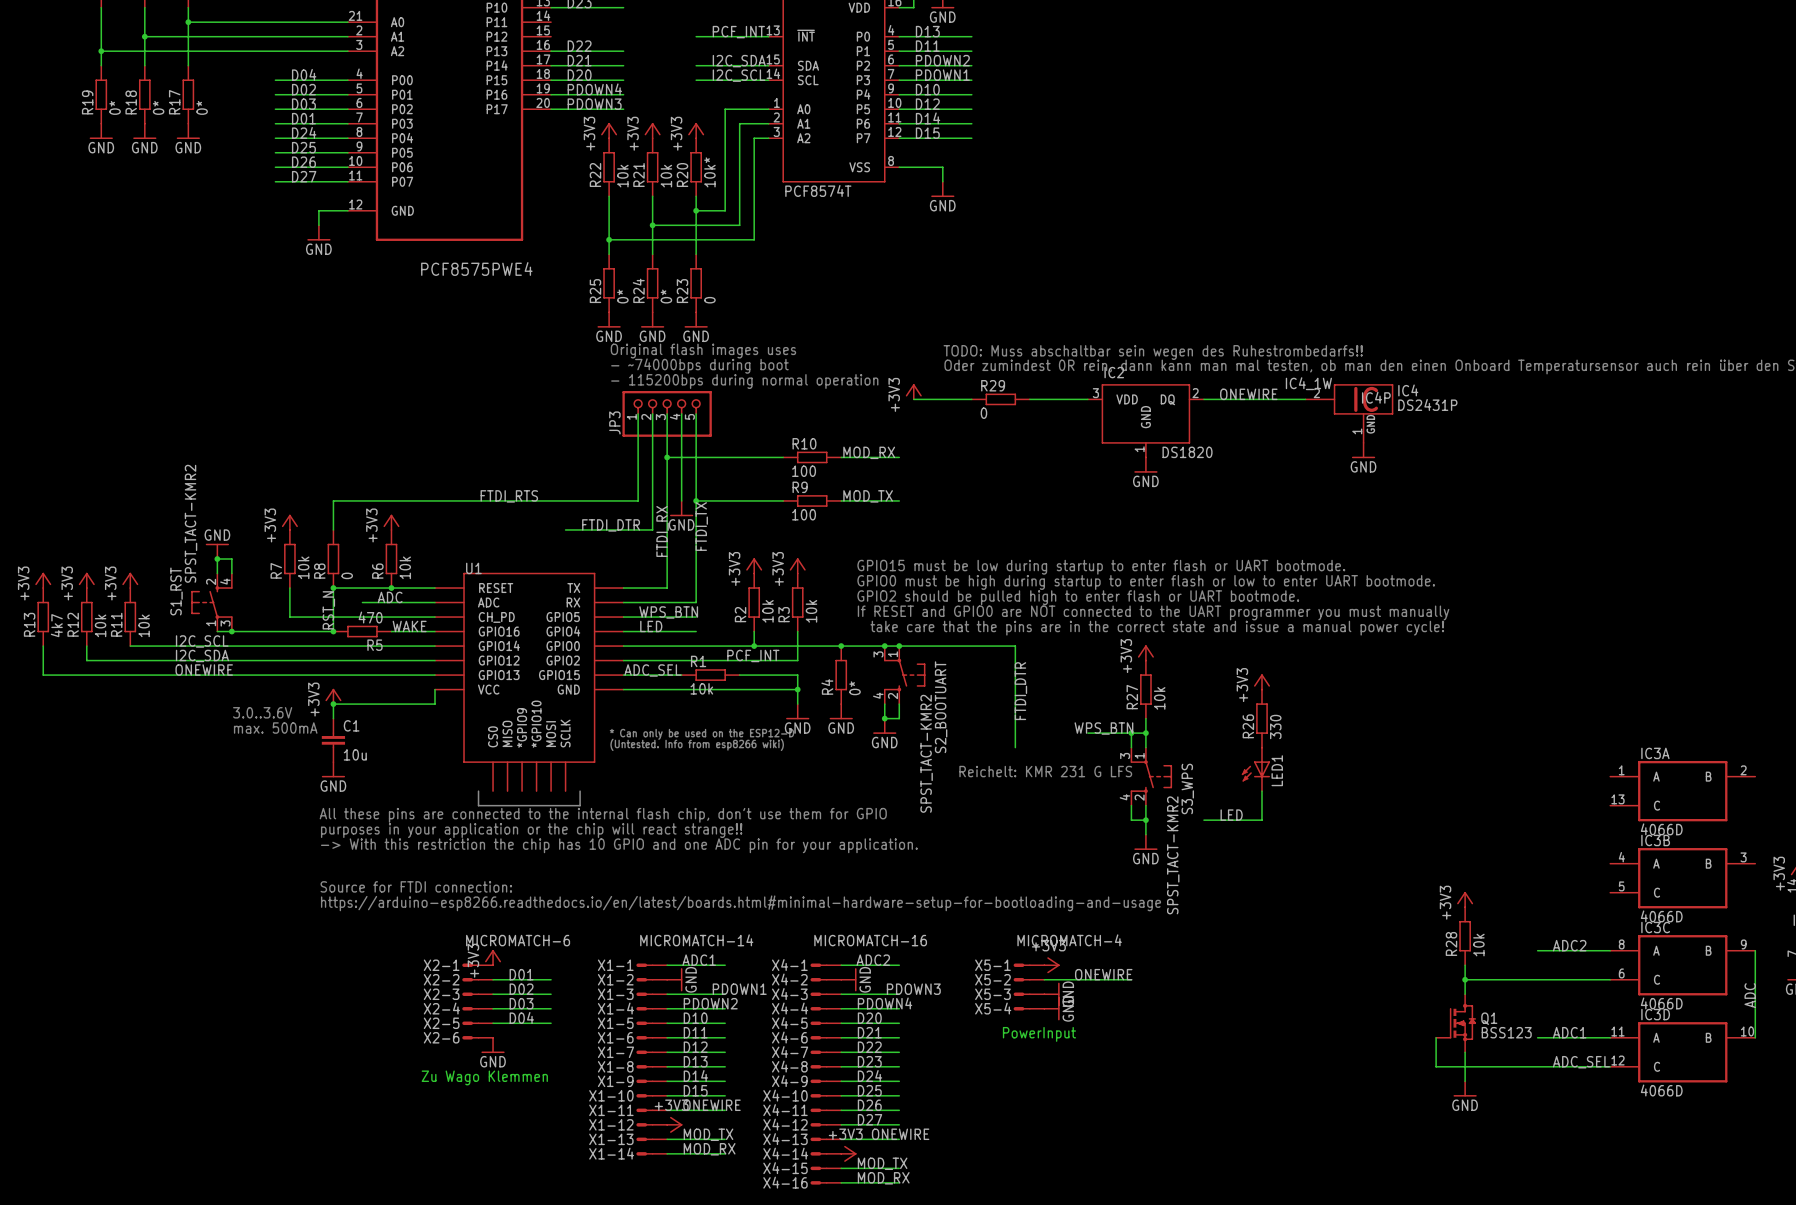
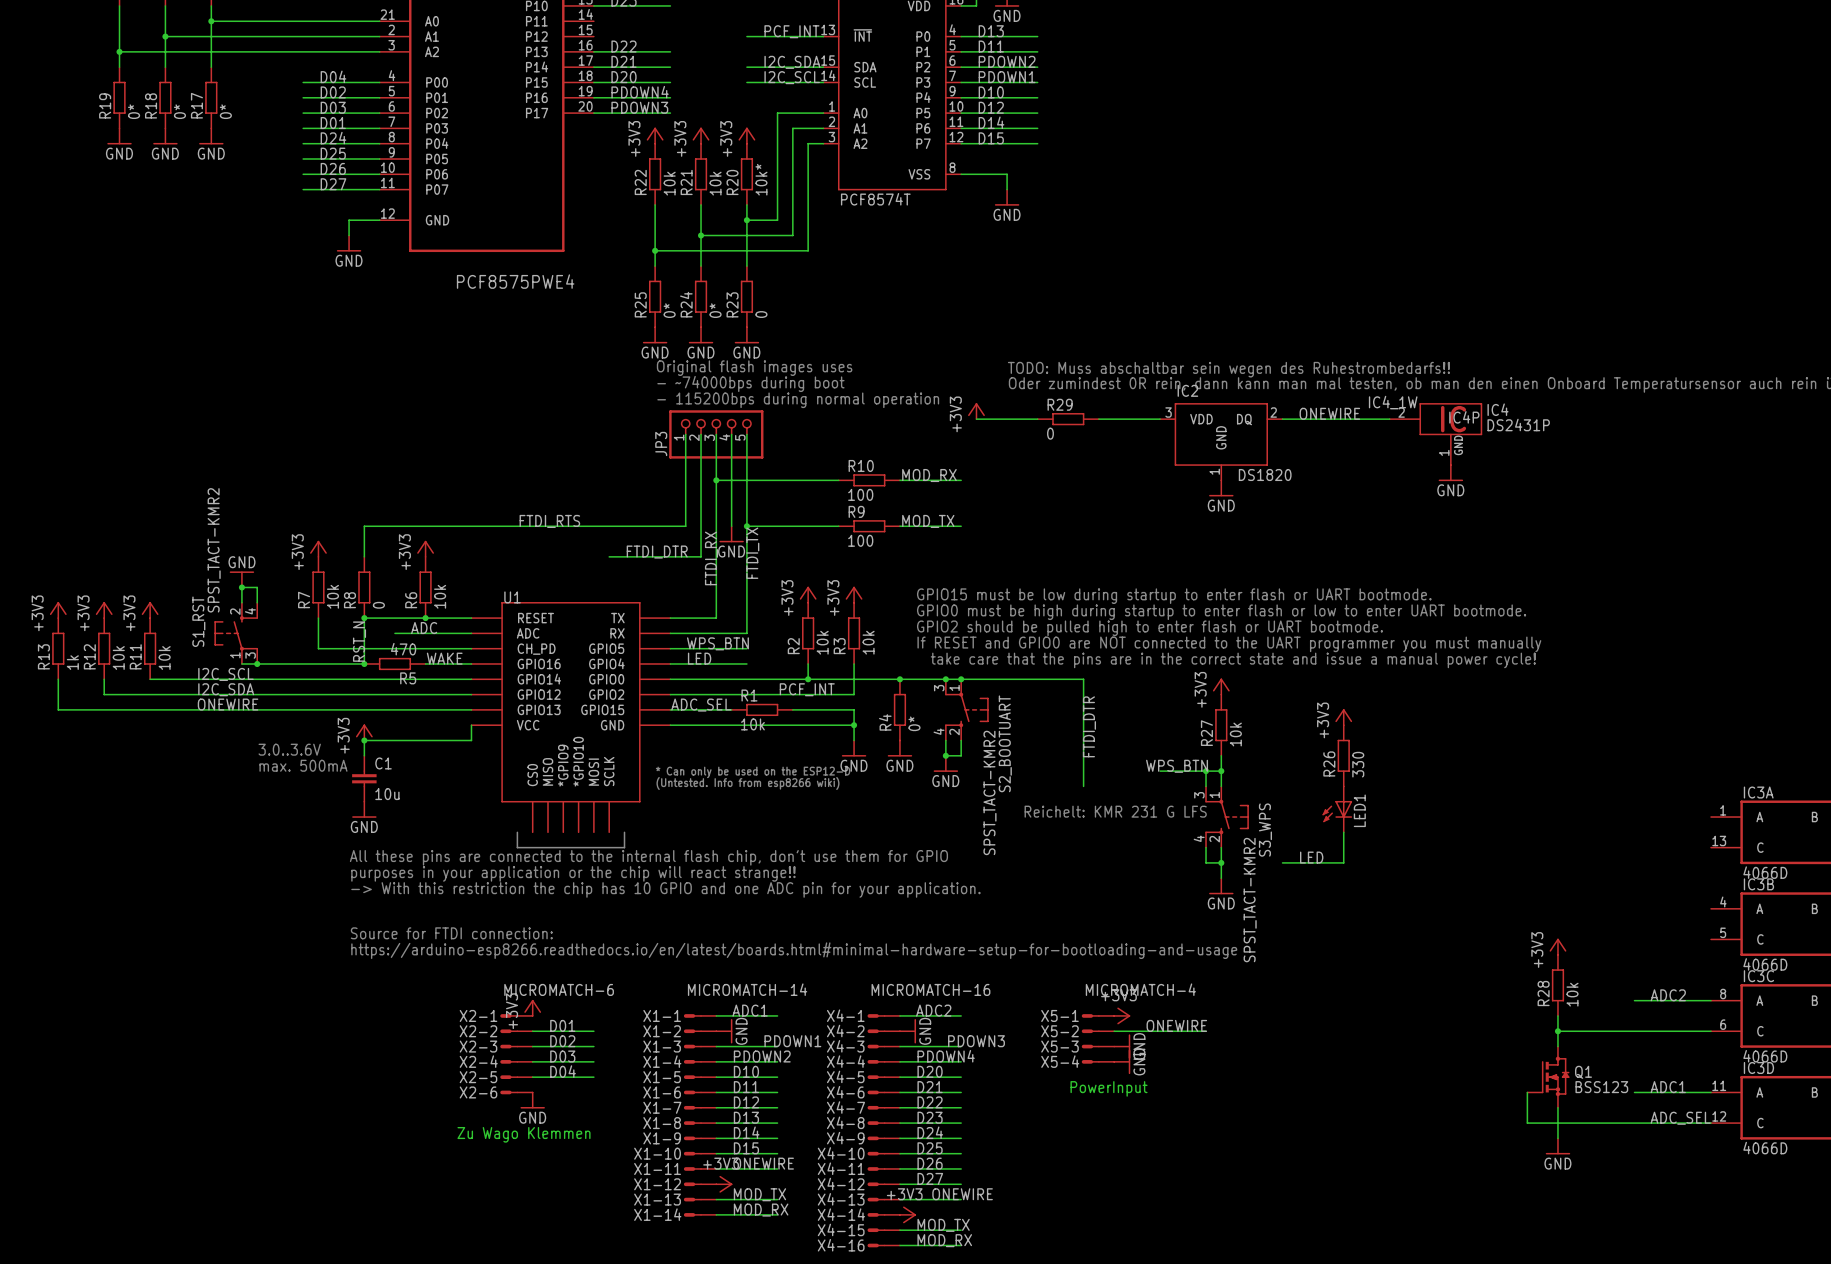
R13 value: 4k7 (56, 625) -> 1k (72, 662)

